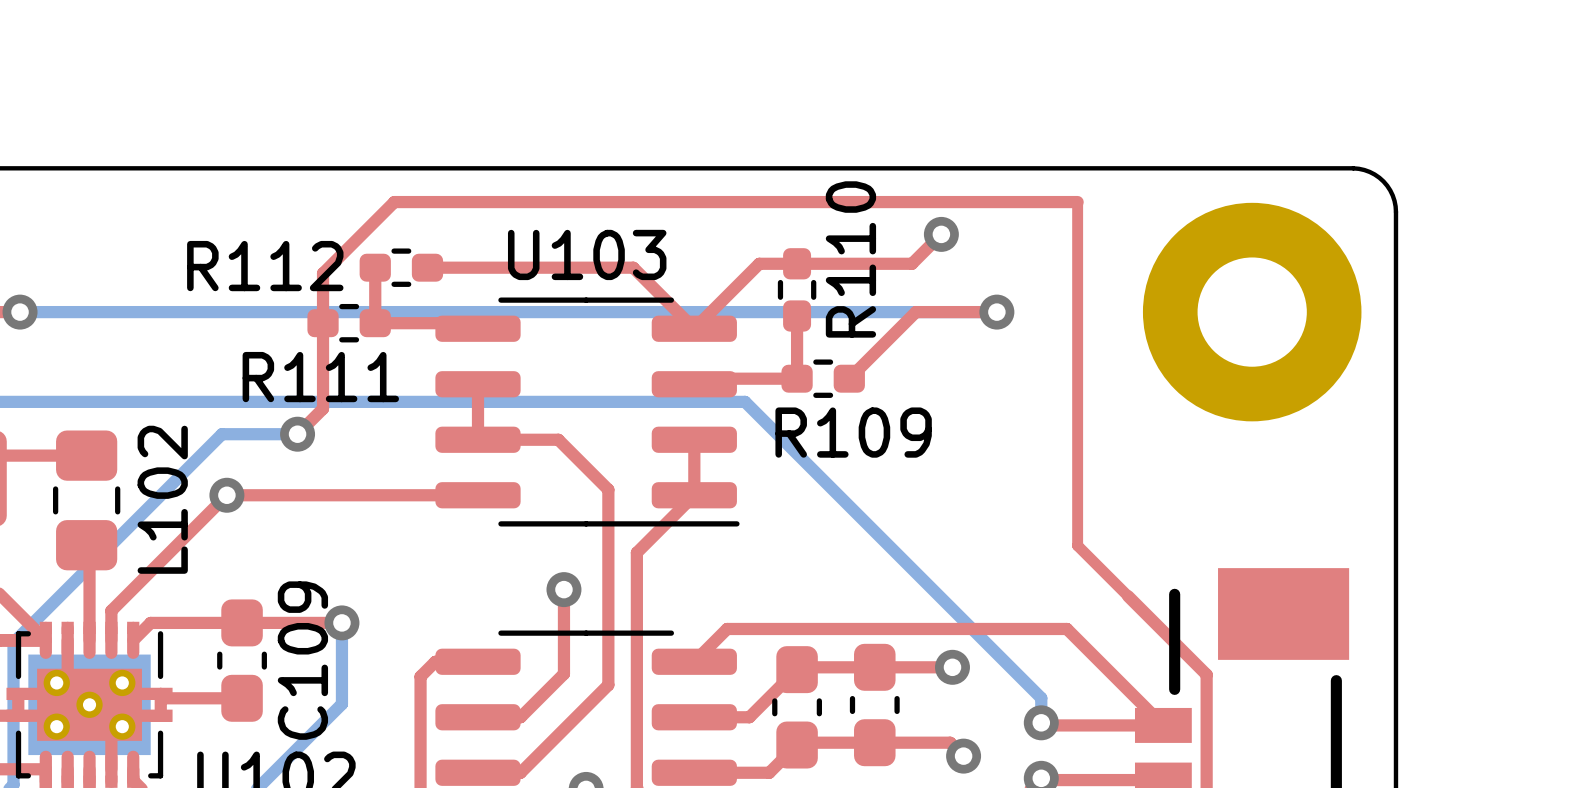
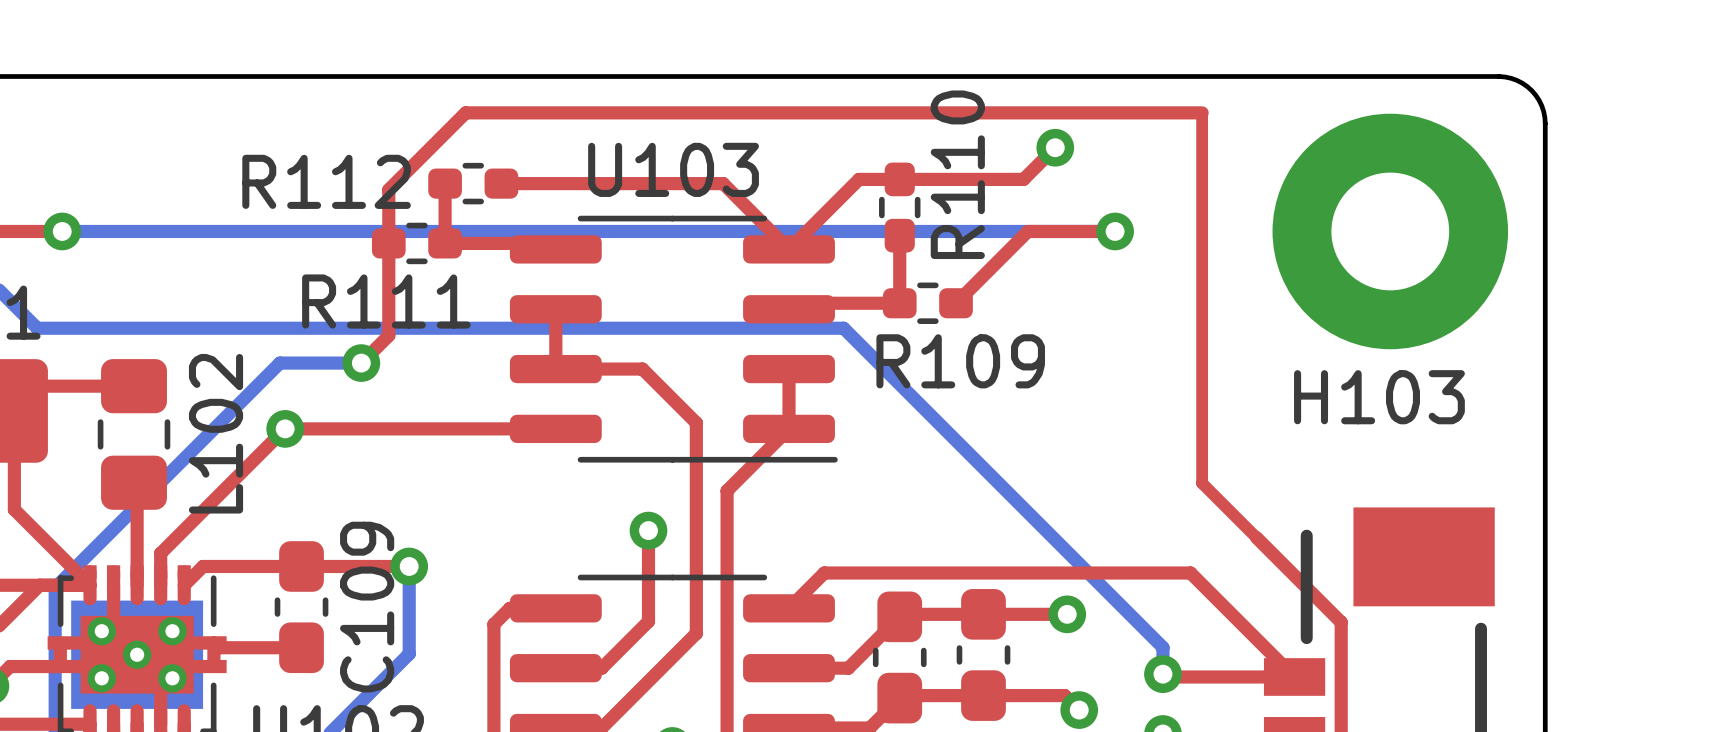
H103 name: none -> H103 (1379, 397)

